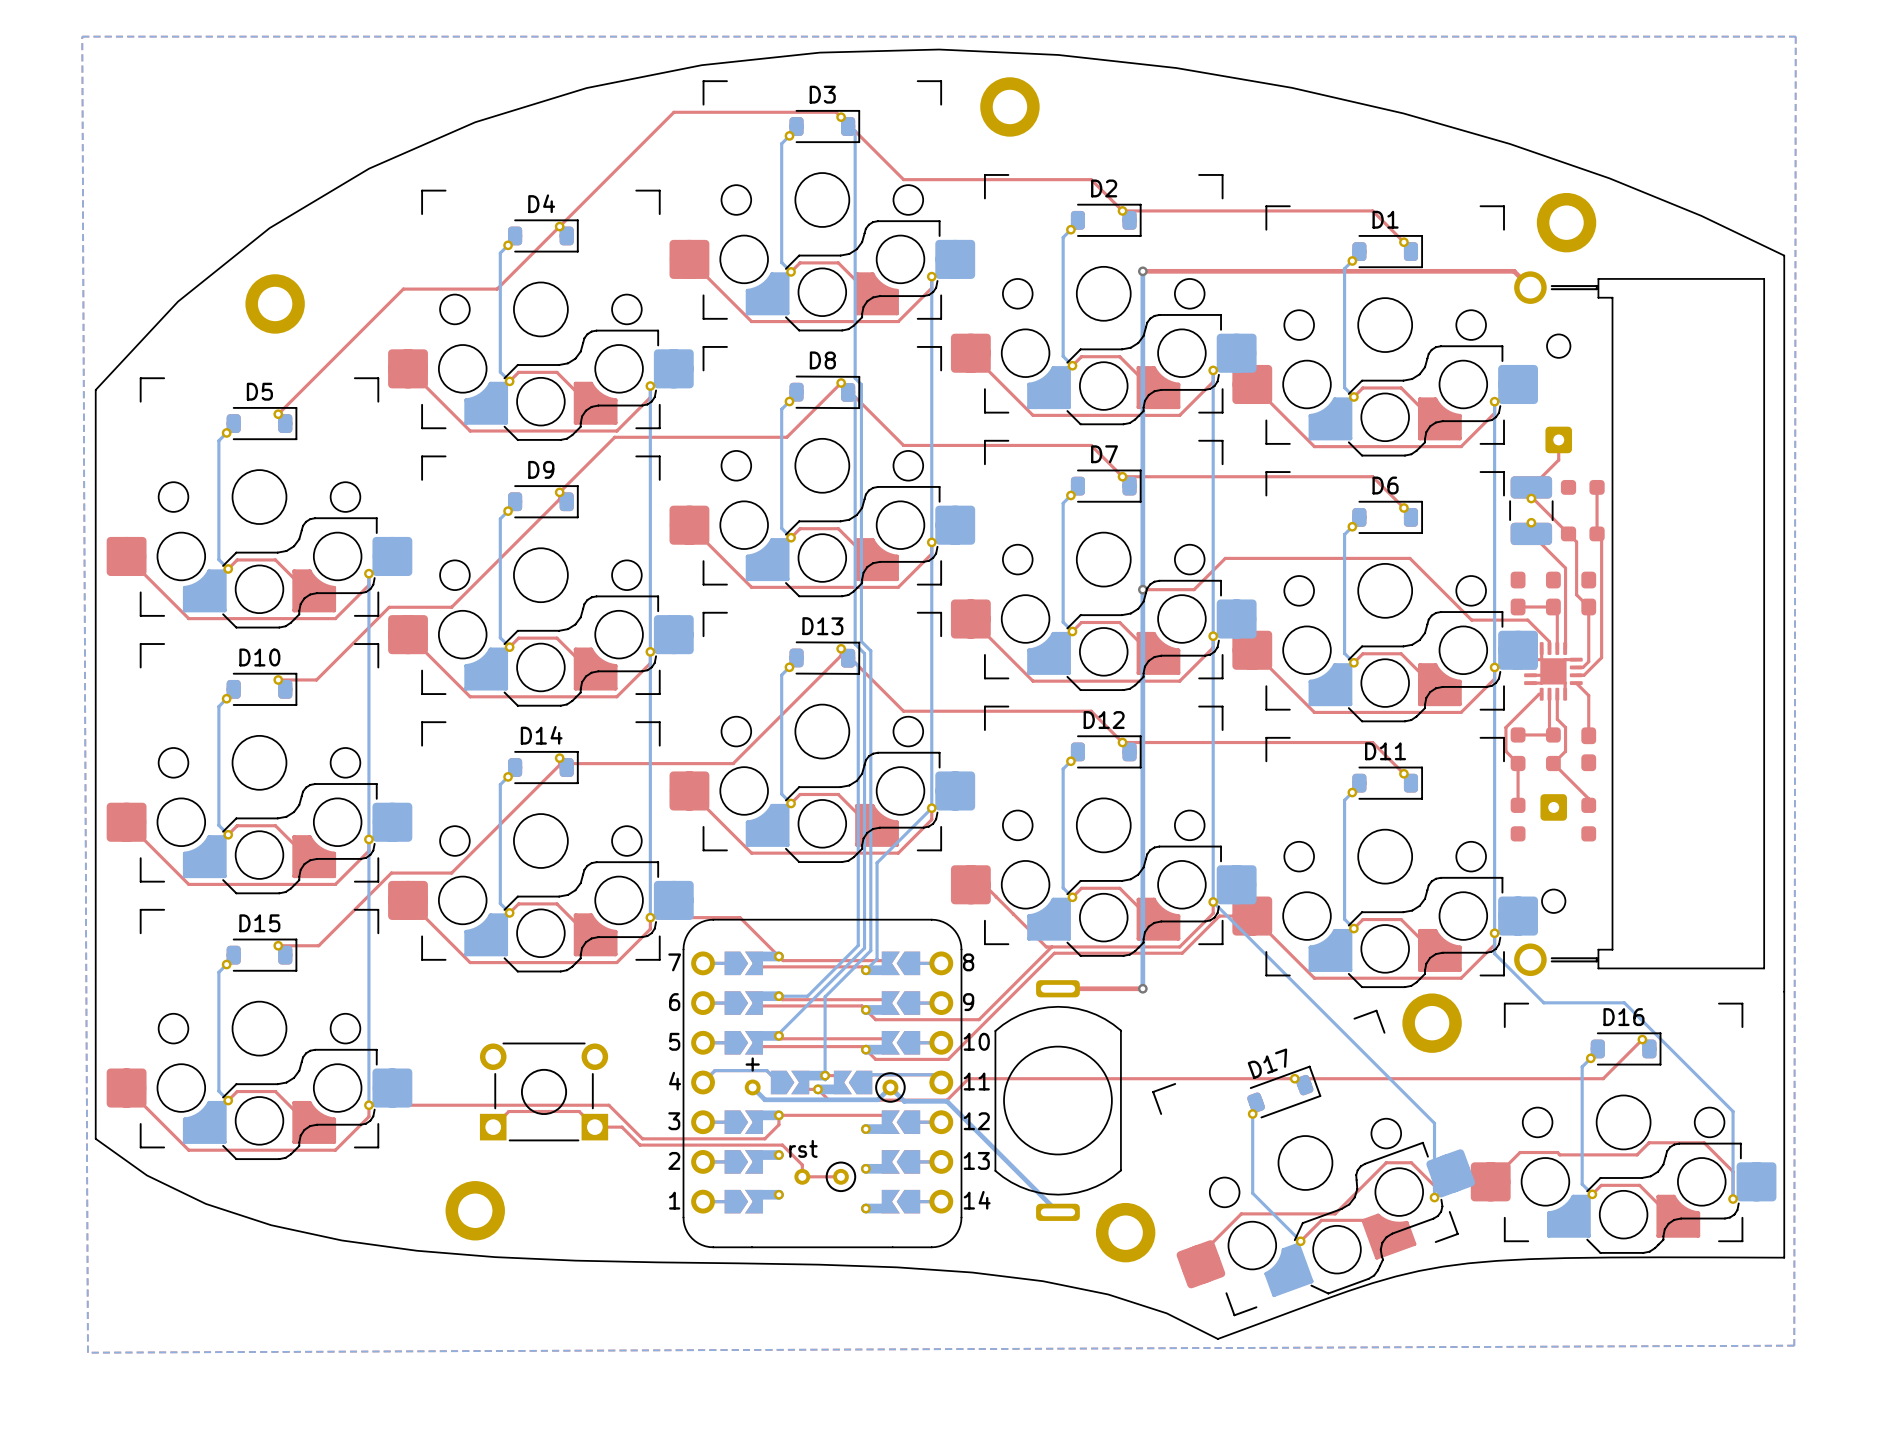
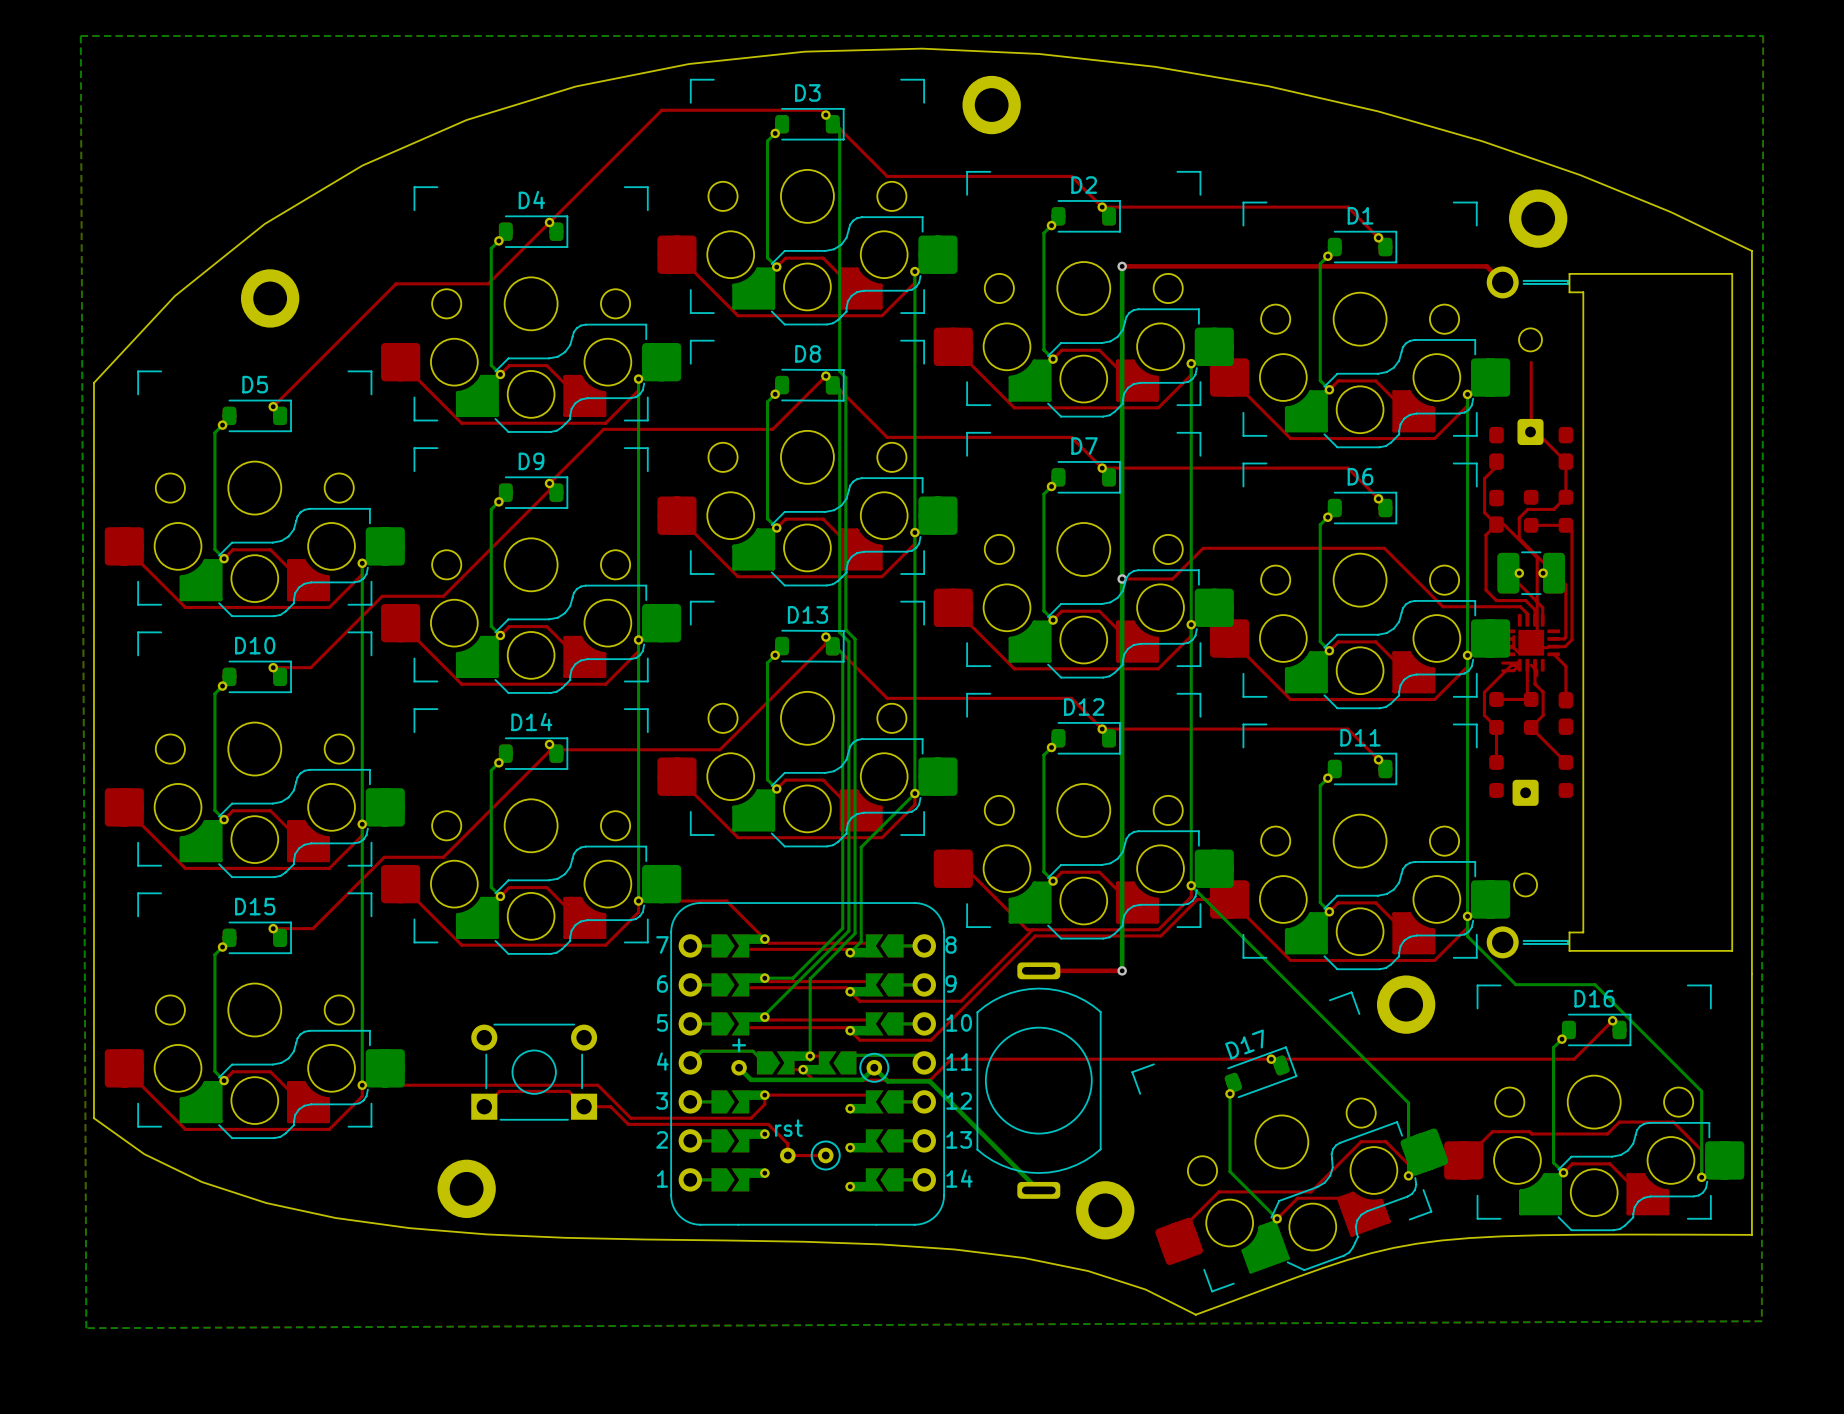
top track: none -> (1531, 362) (1531, 426) (1565, 461) (1565, 497) (1553, 509) (1527, 509) (1519, 517) (1519, 538) (1565, 584) (1565, 637) (1553, 638)
top track: (1558, 439) (1558, 460) (1531, 487) -> none
part: none -> (1496, 448)
part: none -> (1565, 448)
top track: none -> (1500, 462) (1484, 478) (1484, 512) (1496, 524) (1485, 535) (1485, 590) (1496, 600) (1525, 600) (1535, 609) (1535, 620)
part footprint: [1509, 476, 1554, 546] -> [1489, 489, 1504, 533]
part: (1582, 487) -> none
top track: (1597, 487) (1597, 533) (1601, 538) (1601, 657) (1584, 675) (1576, 675) -> none
top track: (1531, 498) (1576, 542) (1576, 594) (1588, 607) (1588, 661) (1582, 667) (1576, 667) -> none
part: none -> (1531, 511)
part: none -> (1565, 511)
part: (1582, 533) -> none
top track: none -> (1531, 525) (1565, 525) (1571, 531) (1571, 639) (1565, 646) (1553, 646)
part footprint: [1545, 571, 1561, 616] -> [1497, 551, 1565, 595]
top track: none -> (1508, 573) (1542, 607) (1542, 620)
part: (1518, 593) -> none
part: (1588, 593) -> none
top track: (1518, 607) (1553, 607) (1557, 610) (1557, 648) -> none
top track: (1469, 617) (1471, 620) (1527, 620) (1549, 641) (1549, 648) -> (1442, 606) (1520, 606) (1527, 613) (1527, 620)
top track: none -> (1553, 654) (1565, 666) (1565, 700)
part position: (1553, 671) -> (1531, 642)
top track: none -> (1519, 665) (1511, 665) (1484, 692) (1484, 715) (1496, 727) (1496, 762)
top track: none -> (1527, 665) (1527, 695) (1531, 699) (1496, 699)
top track: none -> (1535, 665) (1535, 684) (1543, 692) (1543, 715) (1531, 727)
top track: (1576, 683) (1588, 695) (1588, 735) -> none
top track: (1541, 694) (1539, 694) (1505, 727) (1505, 751) (1518, 763) (1518, 805) -> none
top track: (1549, 694) (1549, 731) (1553, 734) (1518, 734) -> none
top track: (1557, 694) (1557, 719) (1565, 727) (1565, 751) (1553, 763) (1588, 798) (1588, 805) -> none
part: none -> (1496, 713)
part: none -> (1531, 713)
top track: none -> (1531, 727) (1565, 762)
part: (1518, 749) -> none
part: (1553, 749) -> none
part position: (1588, 749) -> (1565, 713)
part: none -> (1496, 776)
part: none -> (1565, 776)
part: (1518, 819) -> none
part: (1588, 819) -> none

